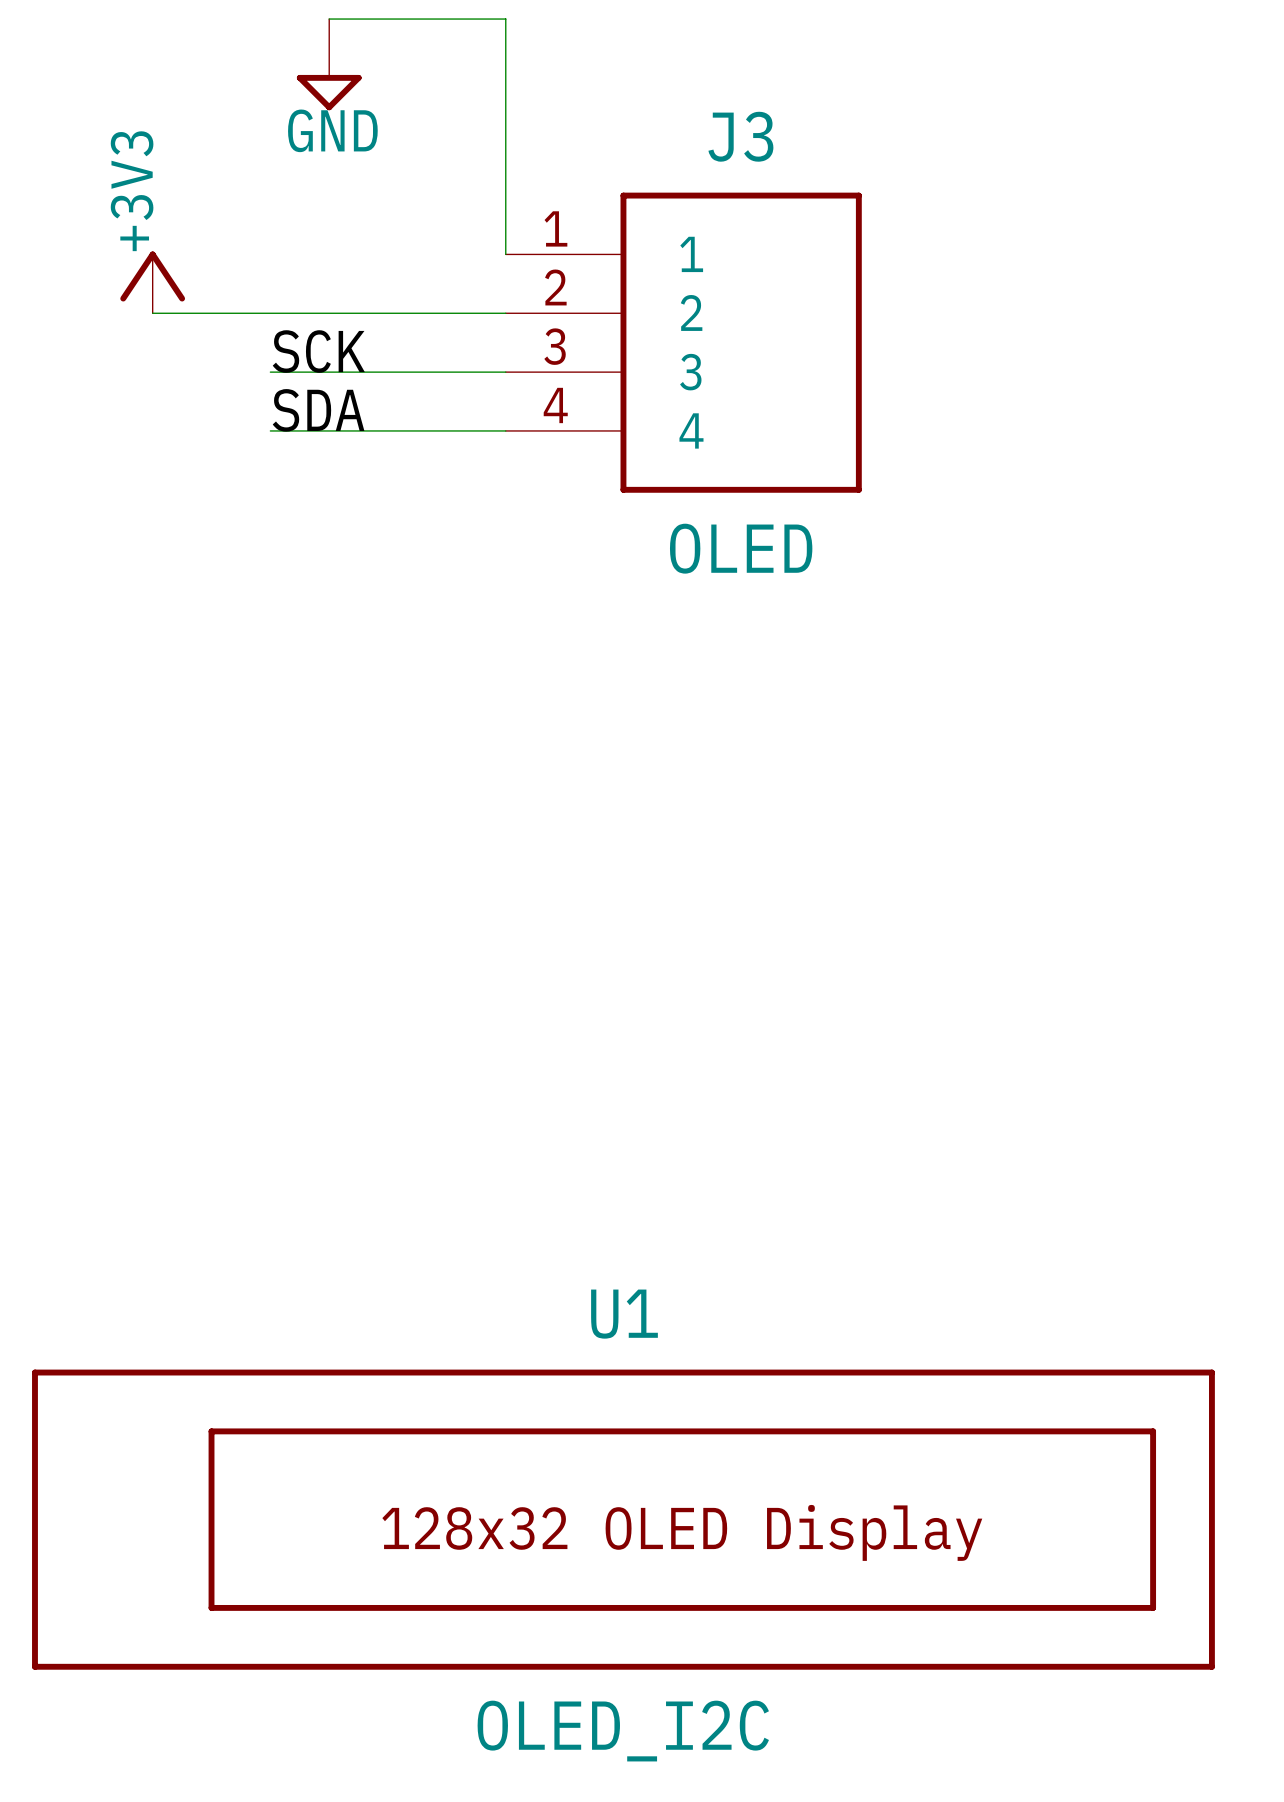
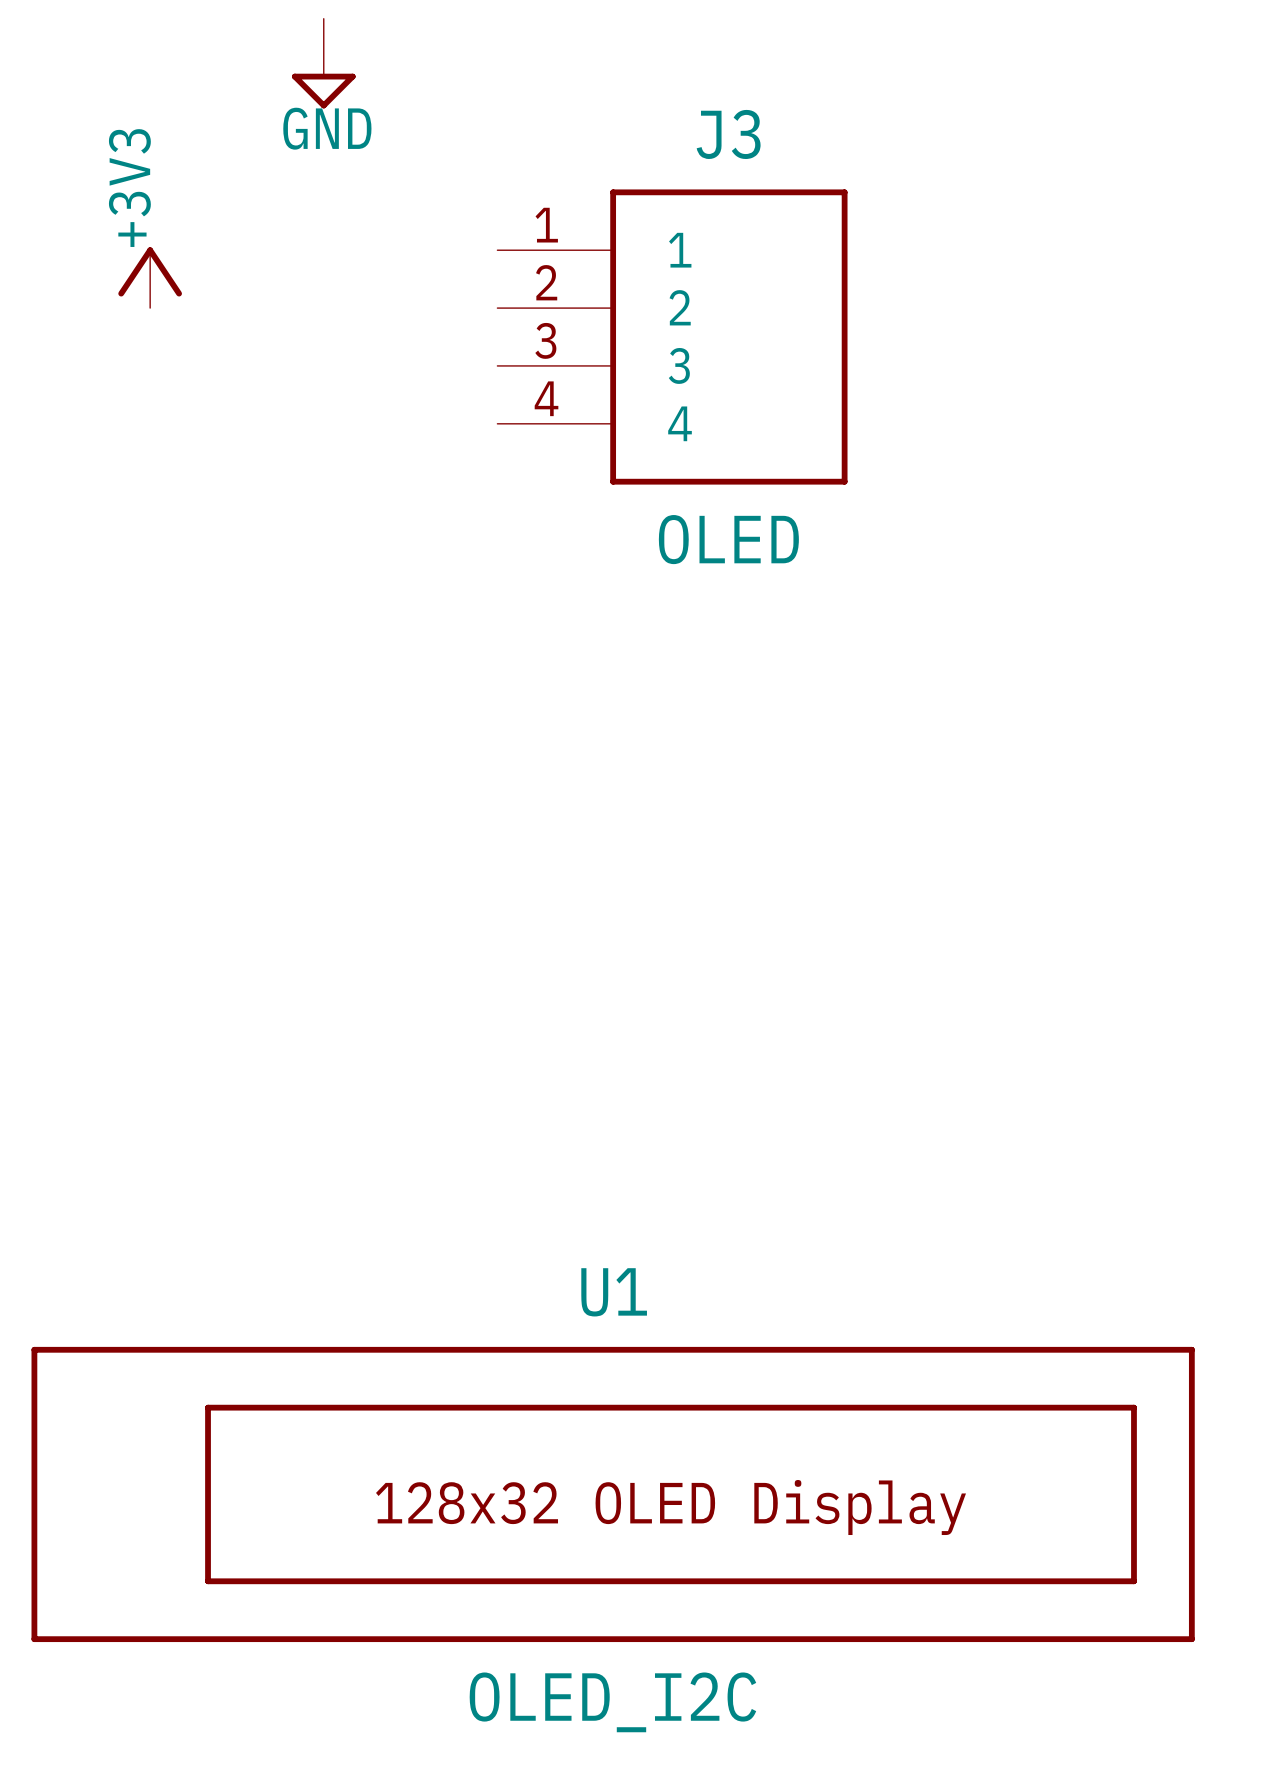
wire: (329, 19) (505, 19) (505, 254) -> none
wire: (152, 313) (505, 313) -> none
label: SCK (318, 351) -> none
wire: (270, 372) (505, 372) -> none
label: SDA (318, 410) -> none
wire: (270, 430) (505, 430) -> none

